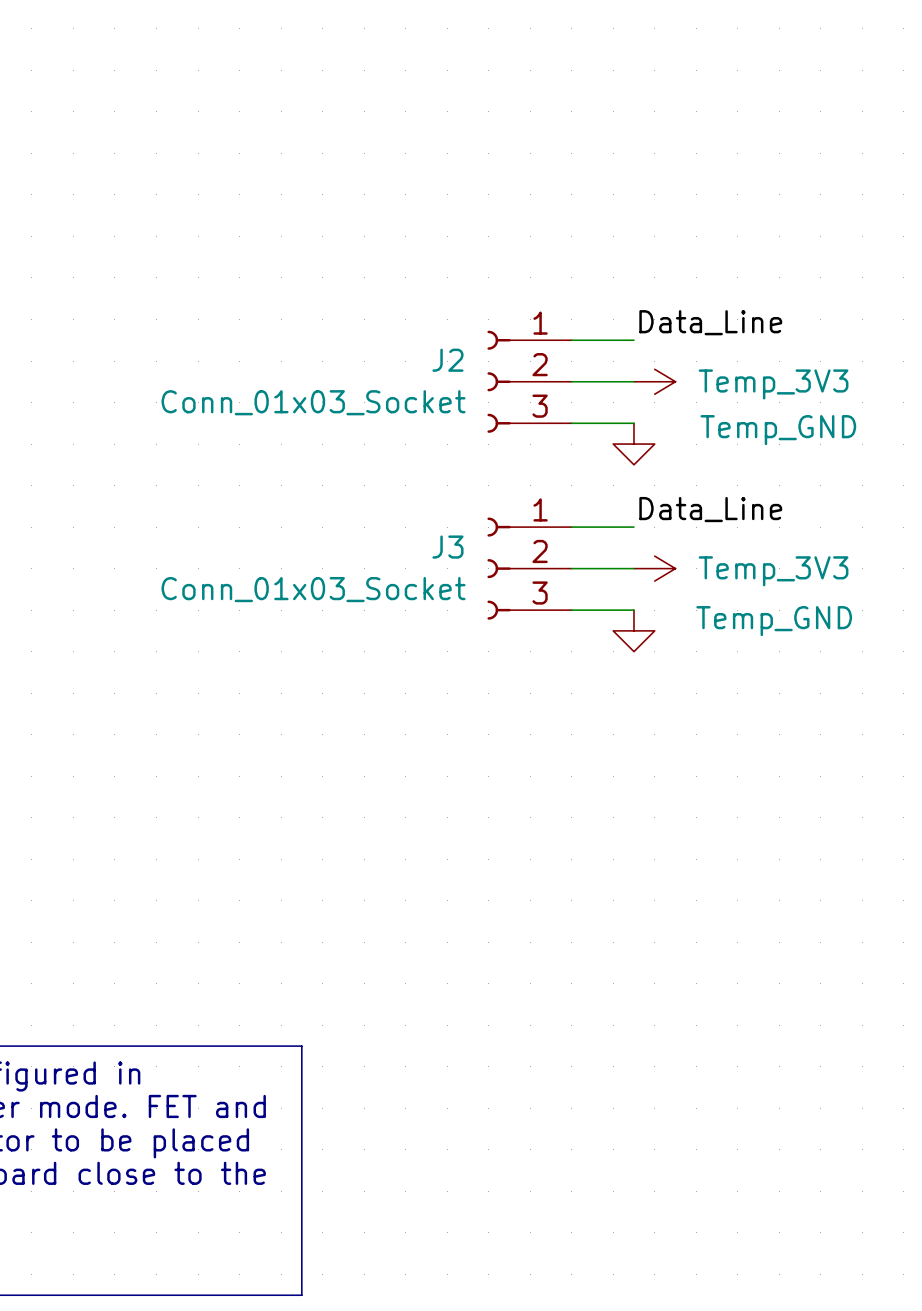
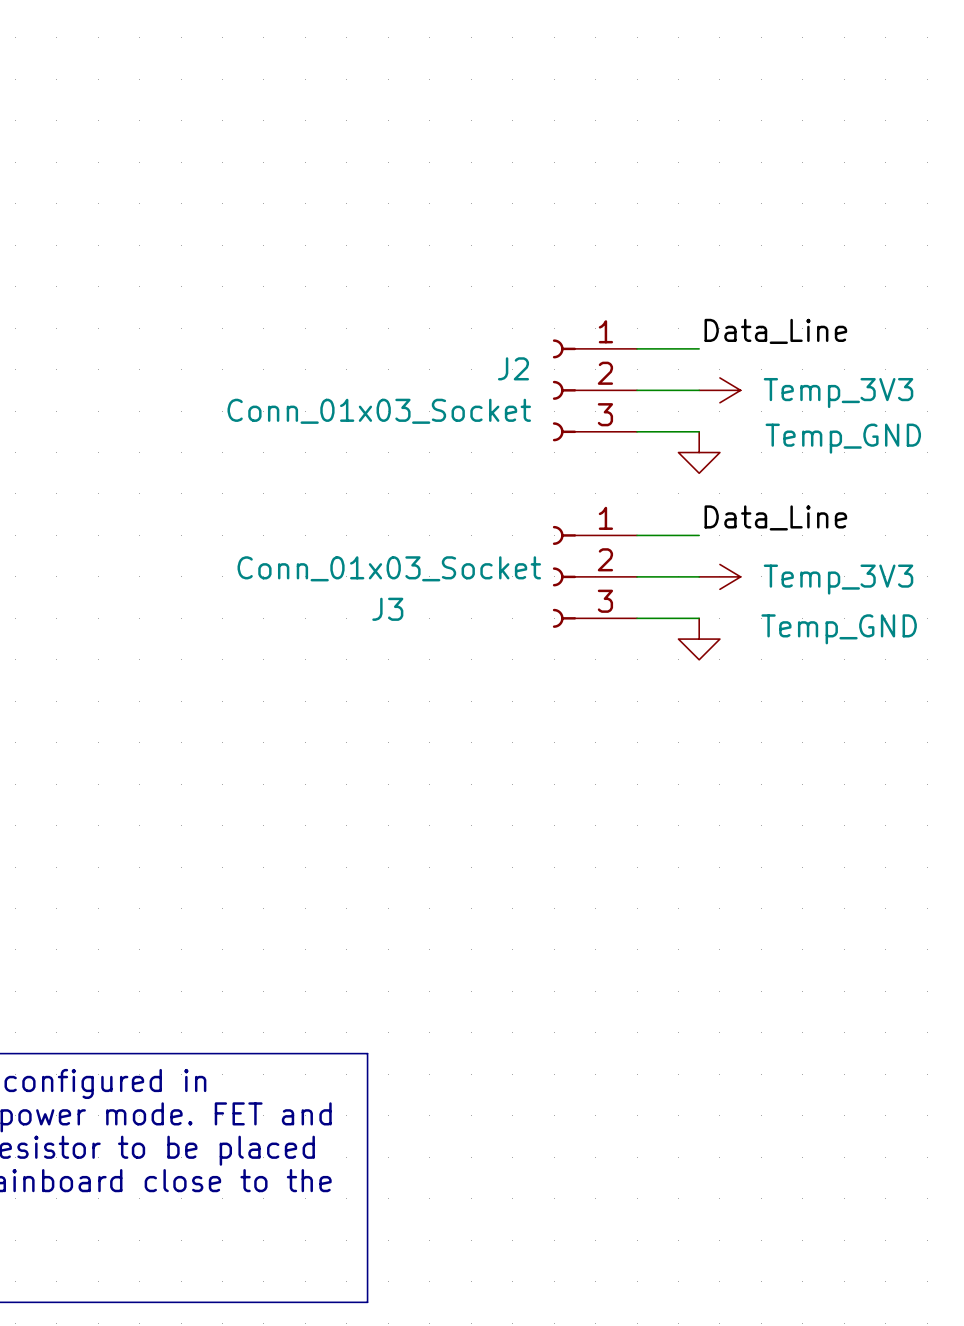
J3 name position: J3 (447, 547) -> J3 (387, 609)
J3 value position: Conn_01x03_Socket (313, 589) -> Conn_01x03_Socket (389, 568)

